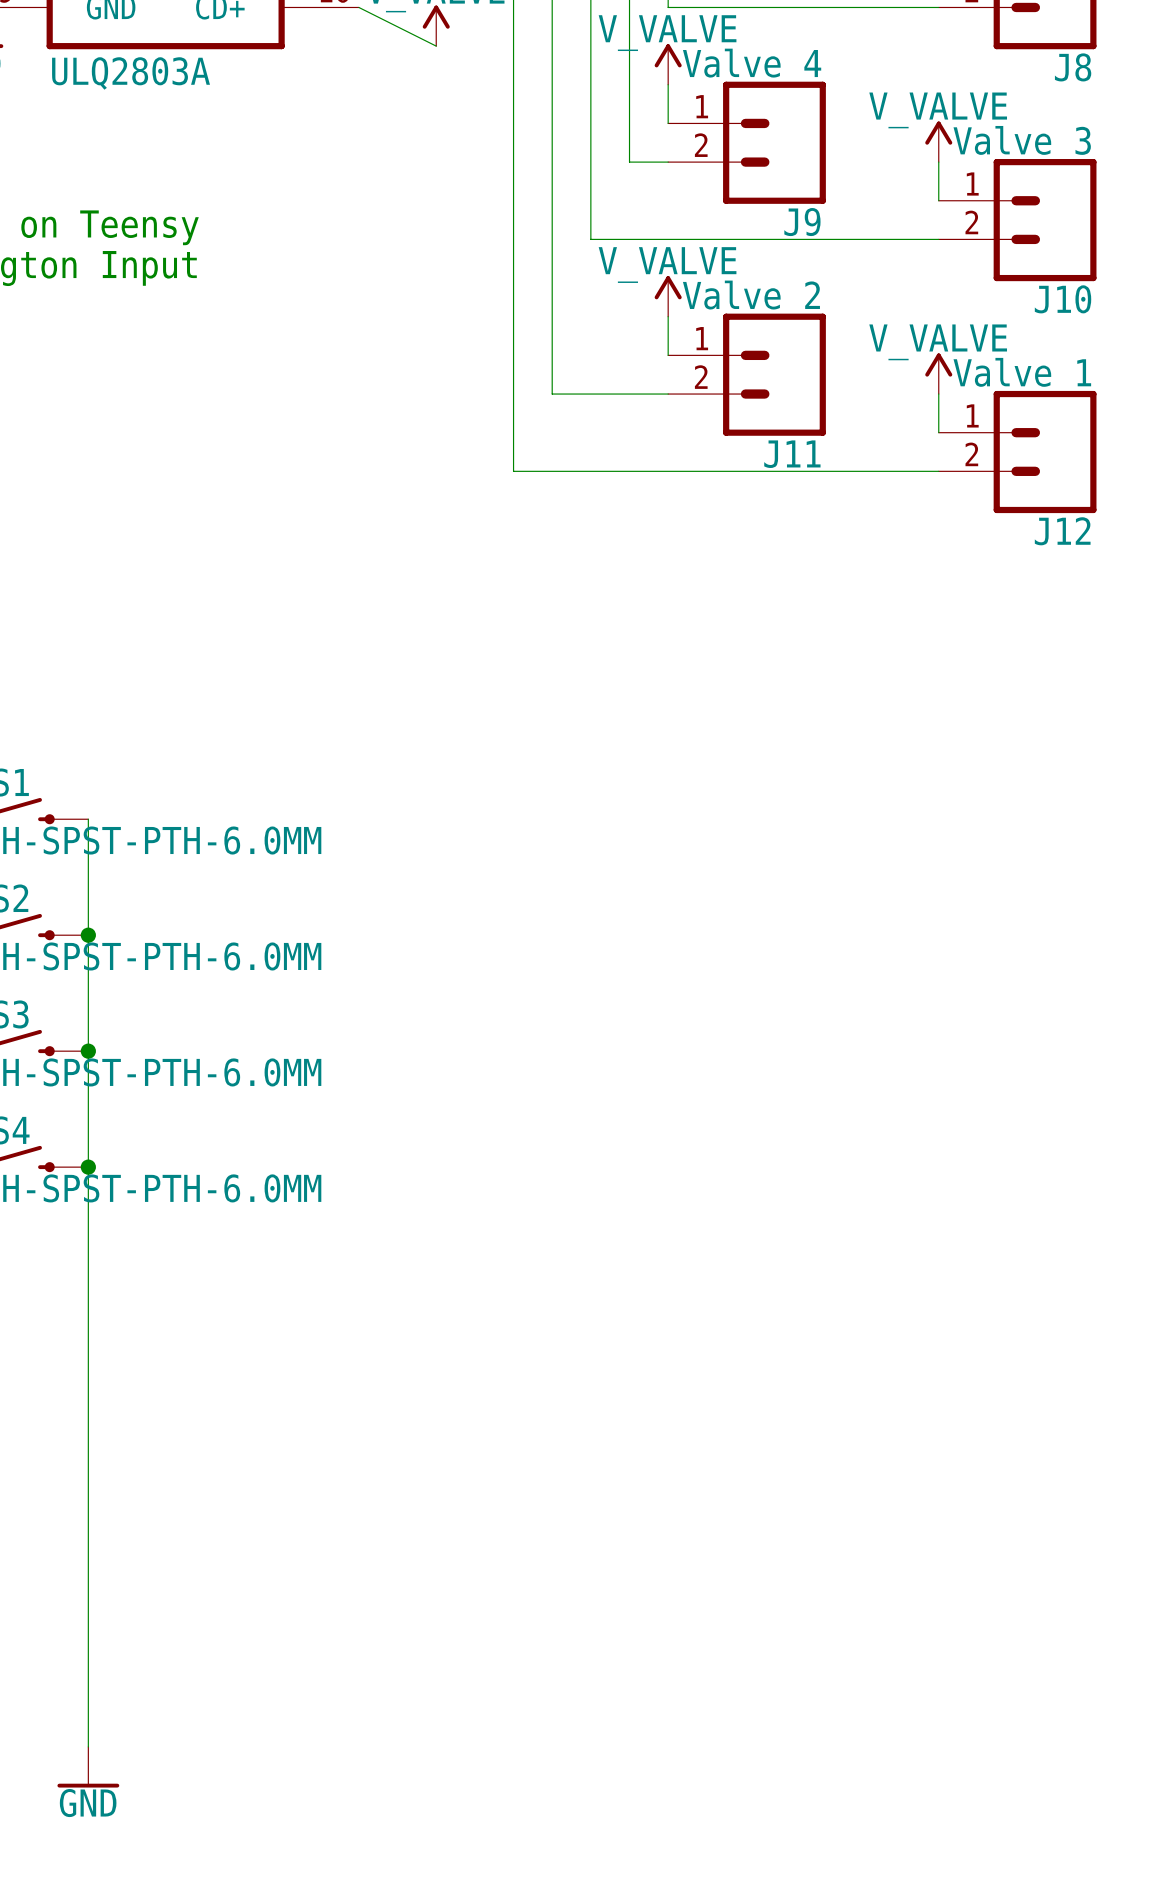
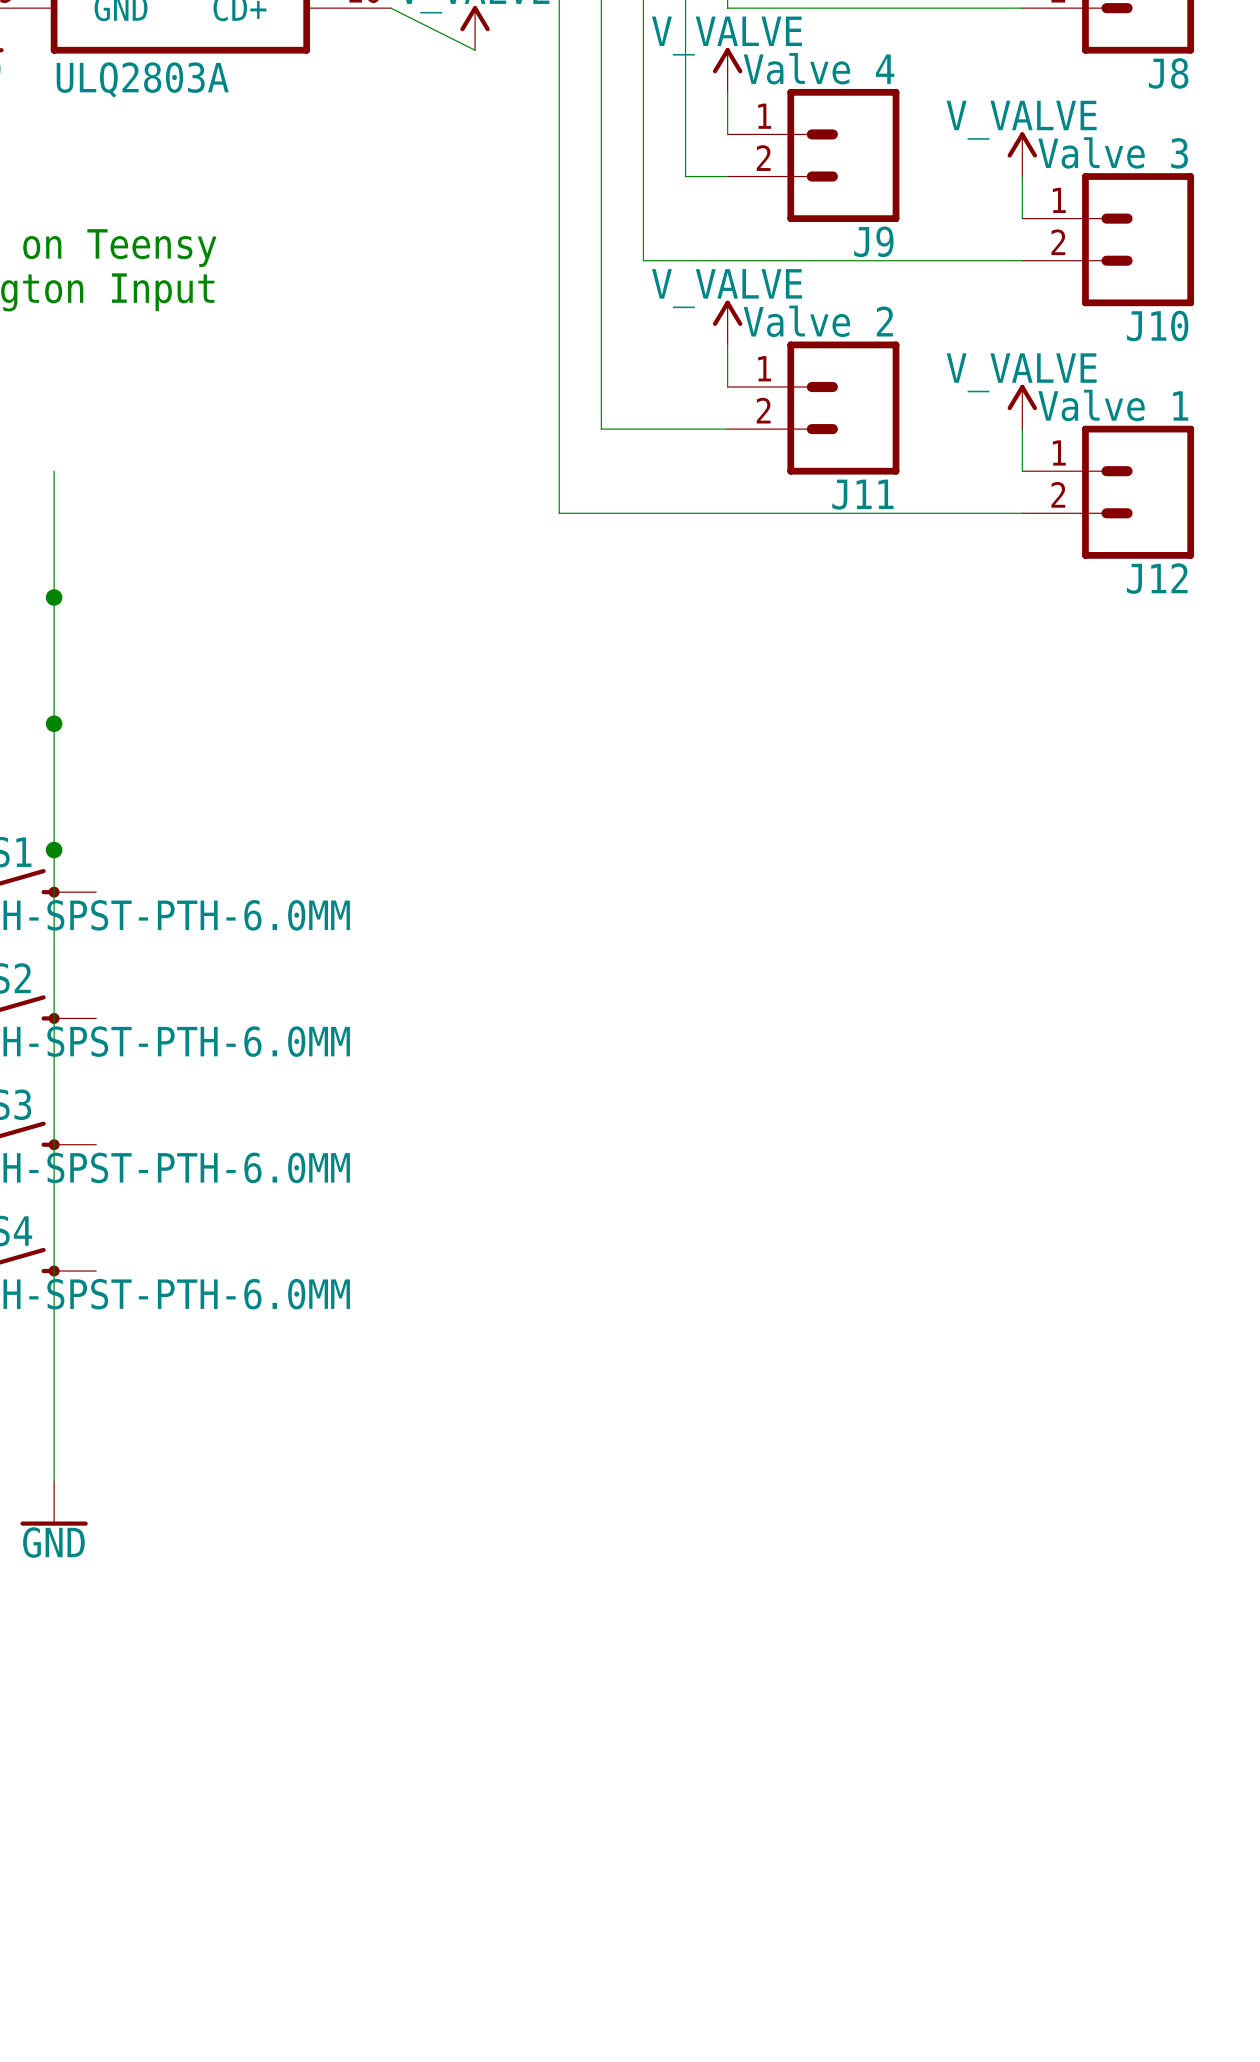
wire: none -> (54, 471) (54, 1481)
junction: none -> (54, 597)
junction: none -> (54, 723)
junction: none -> (54, 850)
wire: (88, 819) (88, 1746) -> none
junction: (88, 935) -> none
junction: (88, 1051) -> none
junction: (88, 1167) -> none
power symbol: none -> GND (54, 1503)
power symbol: GND (88, 1767) -> none

